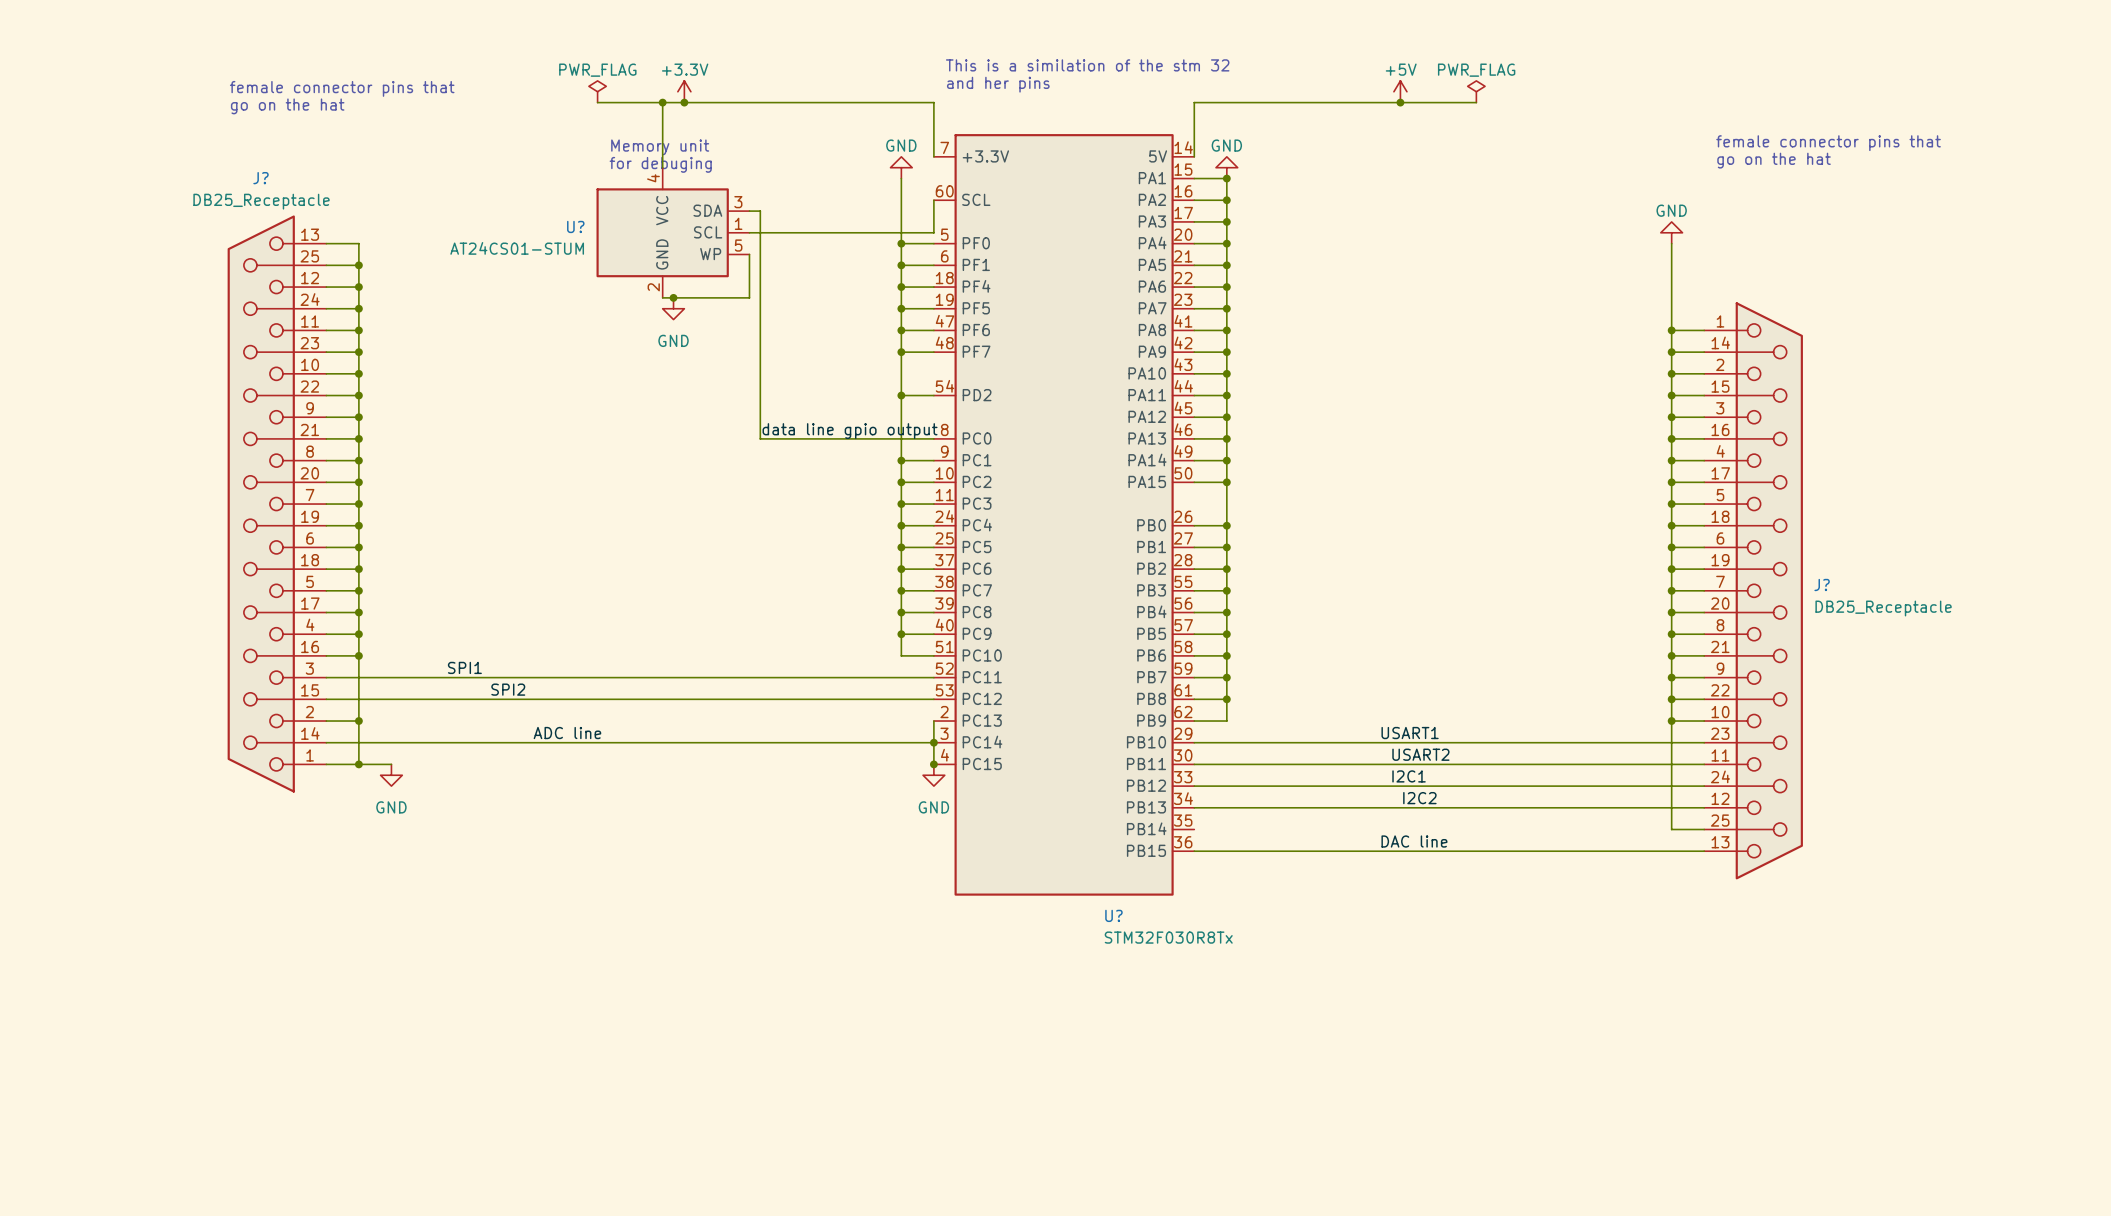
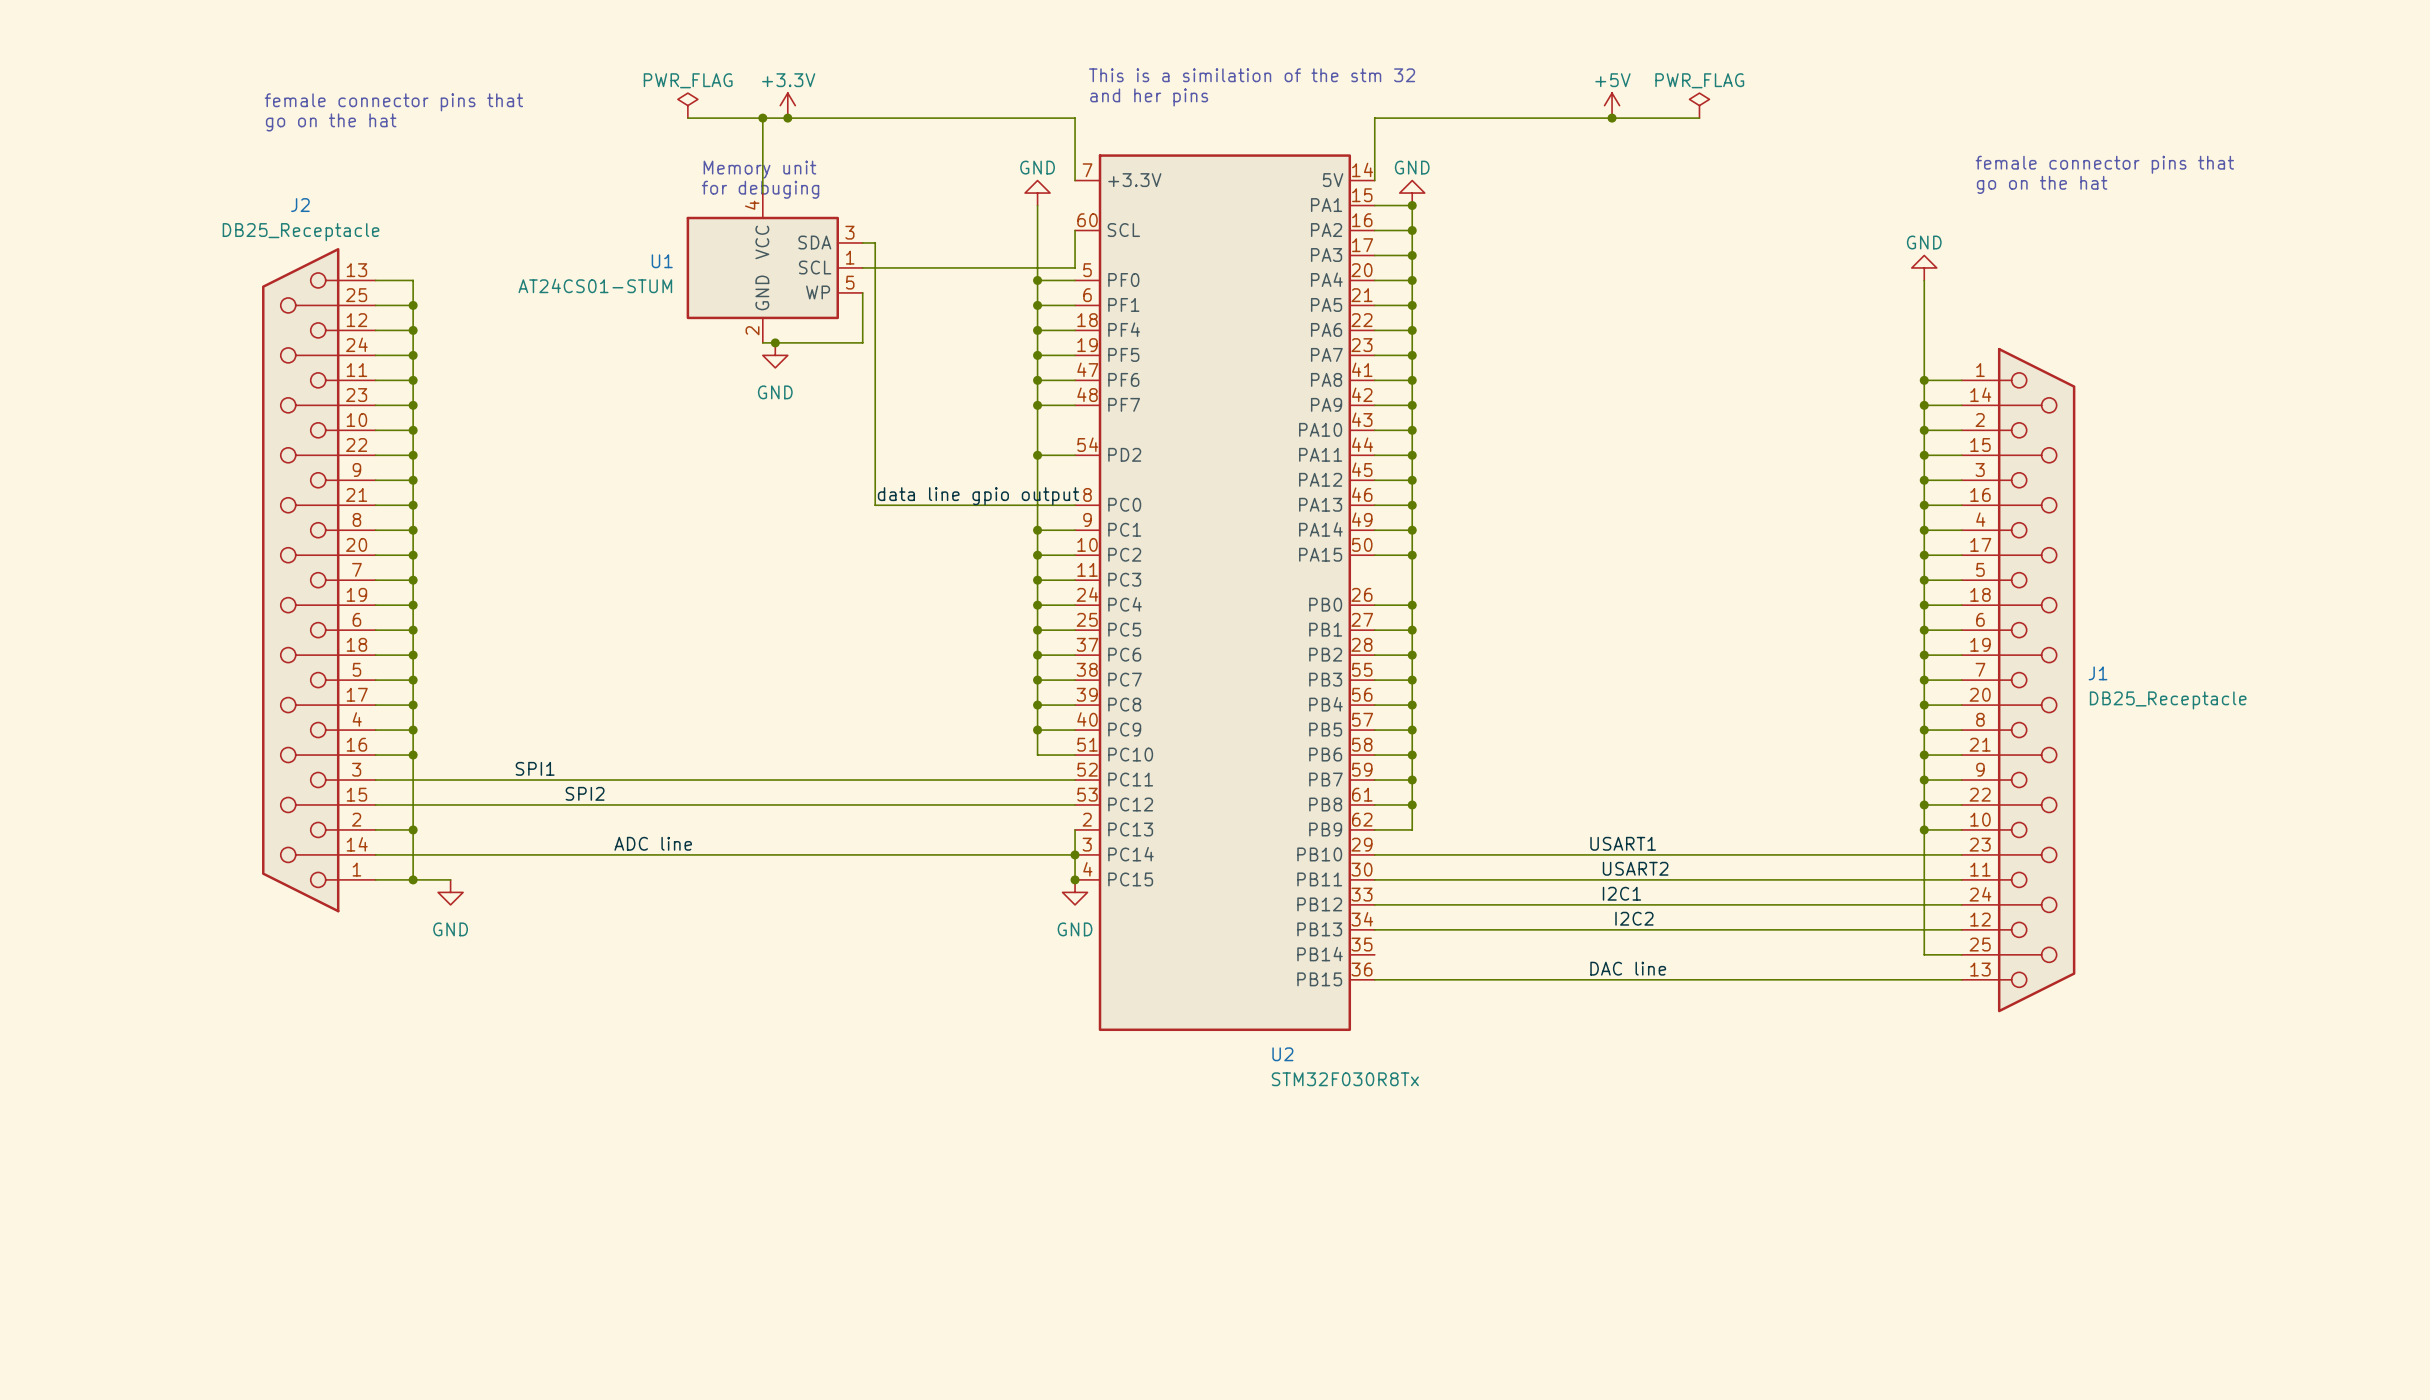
J? name: J? (260, 178) -> J2 (300, 205)
U? name: U? (575, 226) -> U1 (662, 261)
J? name: J? (1822, 584) -> J1 (2098, 673)
U? name: U? (1113, 915) -> U2 (1282, 1054)

